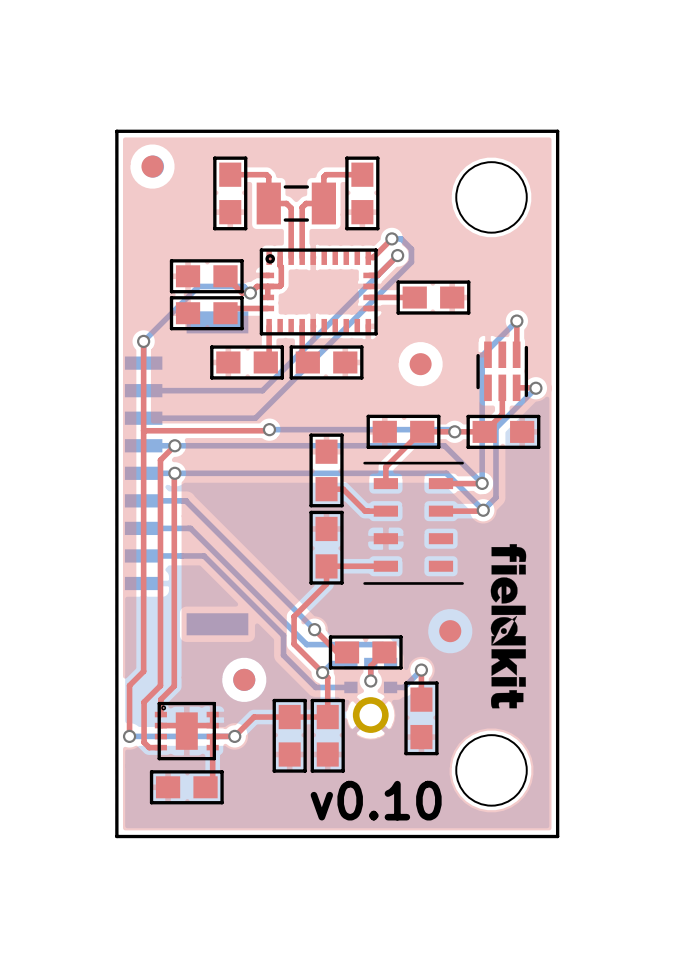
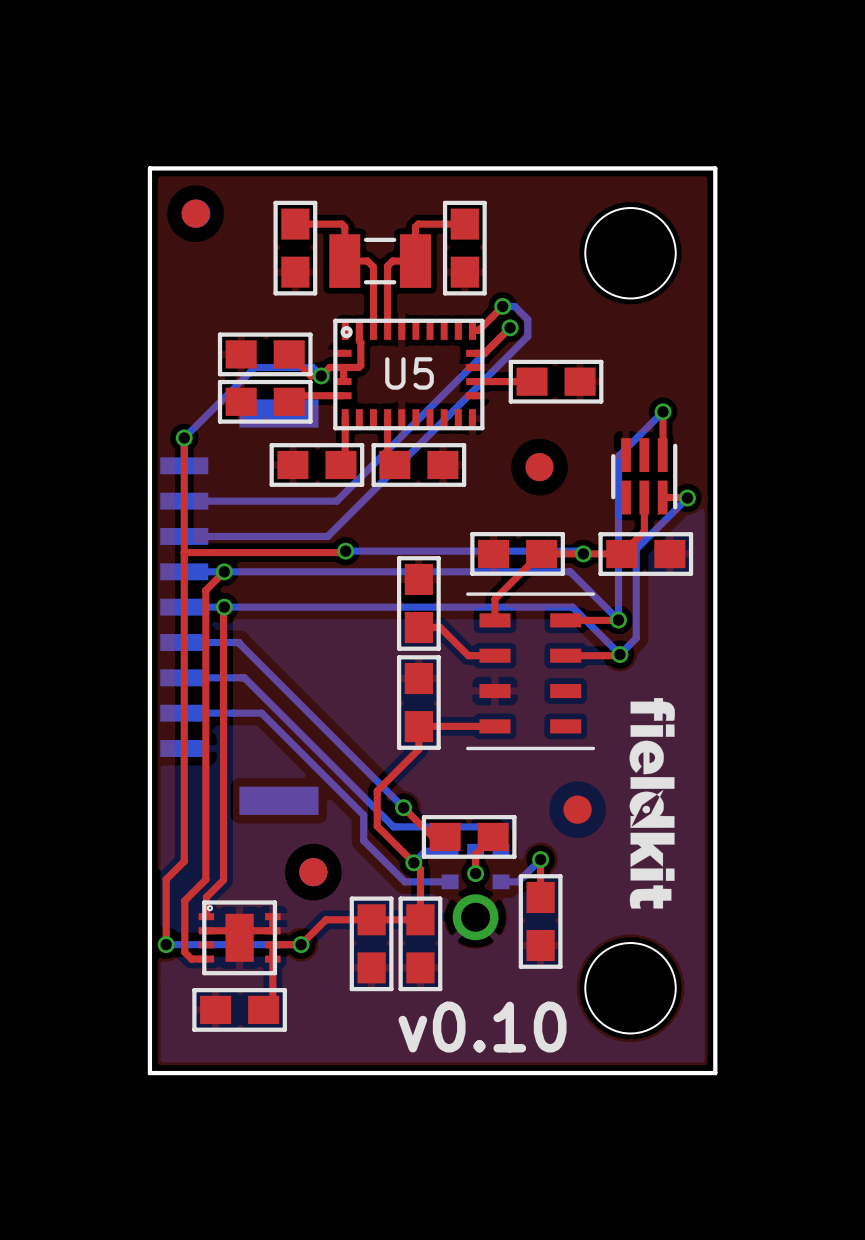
U5 name: none -> U5 (409, 373)

